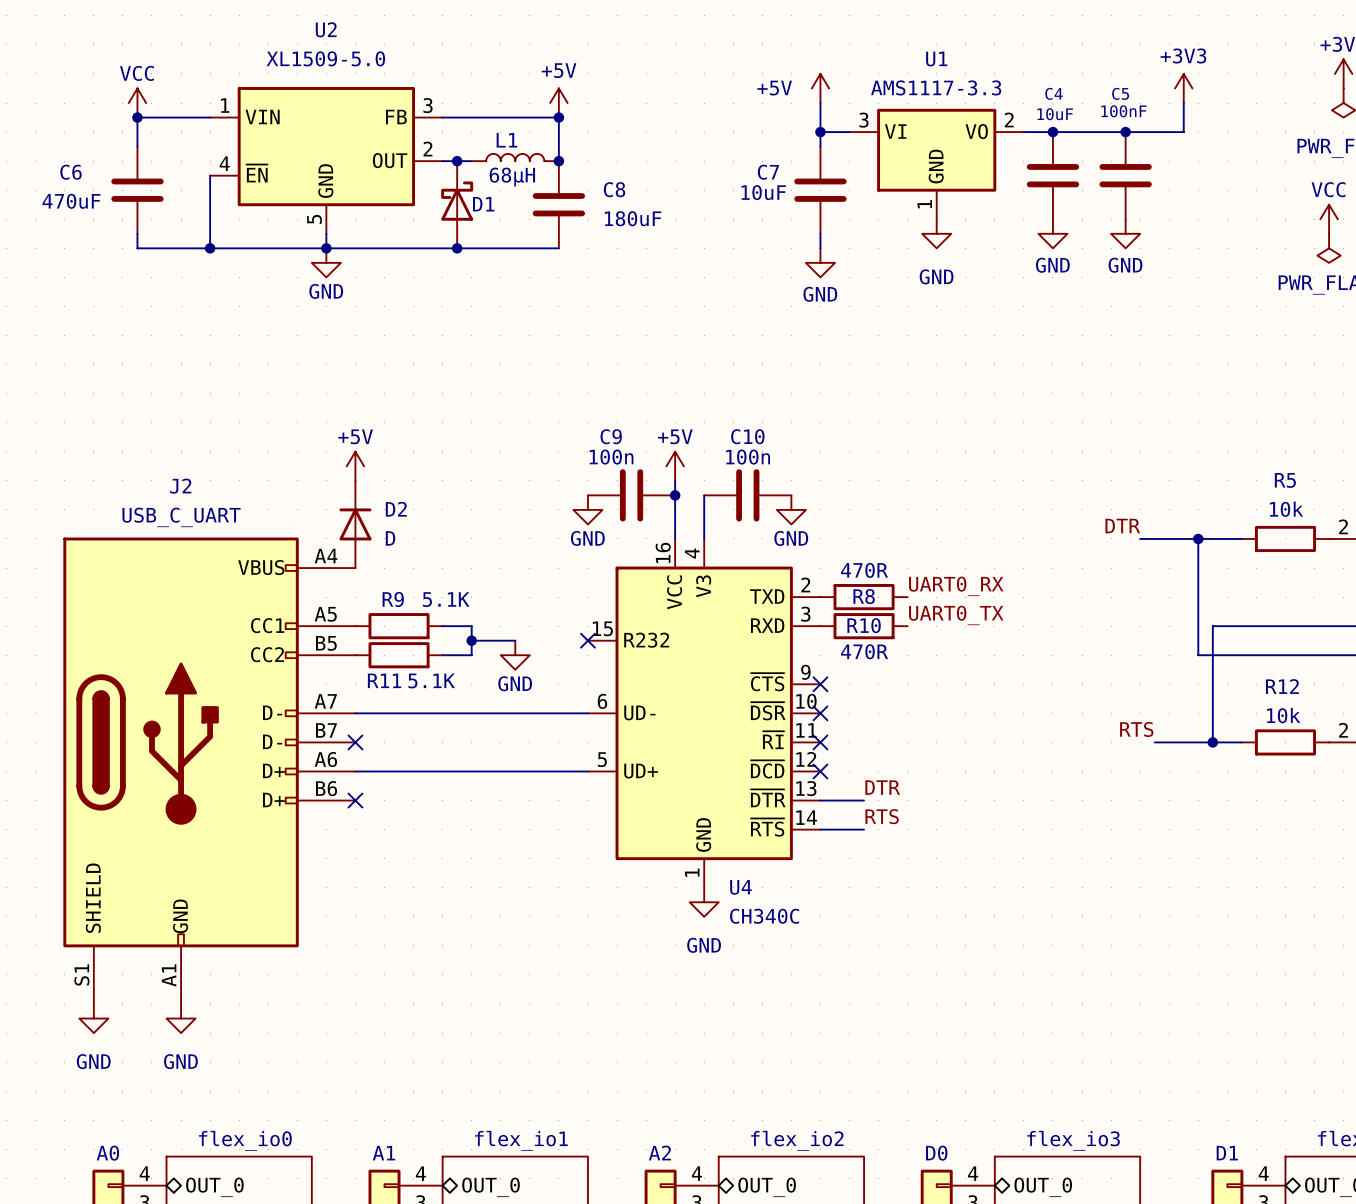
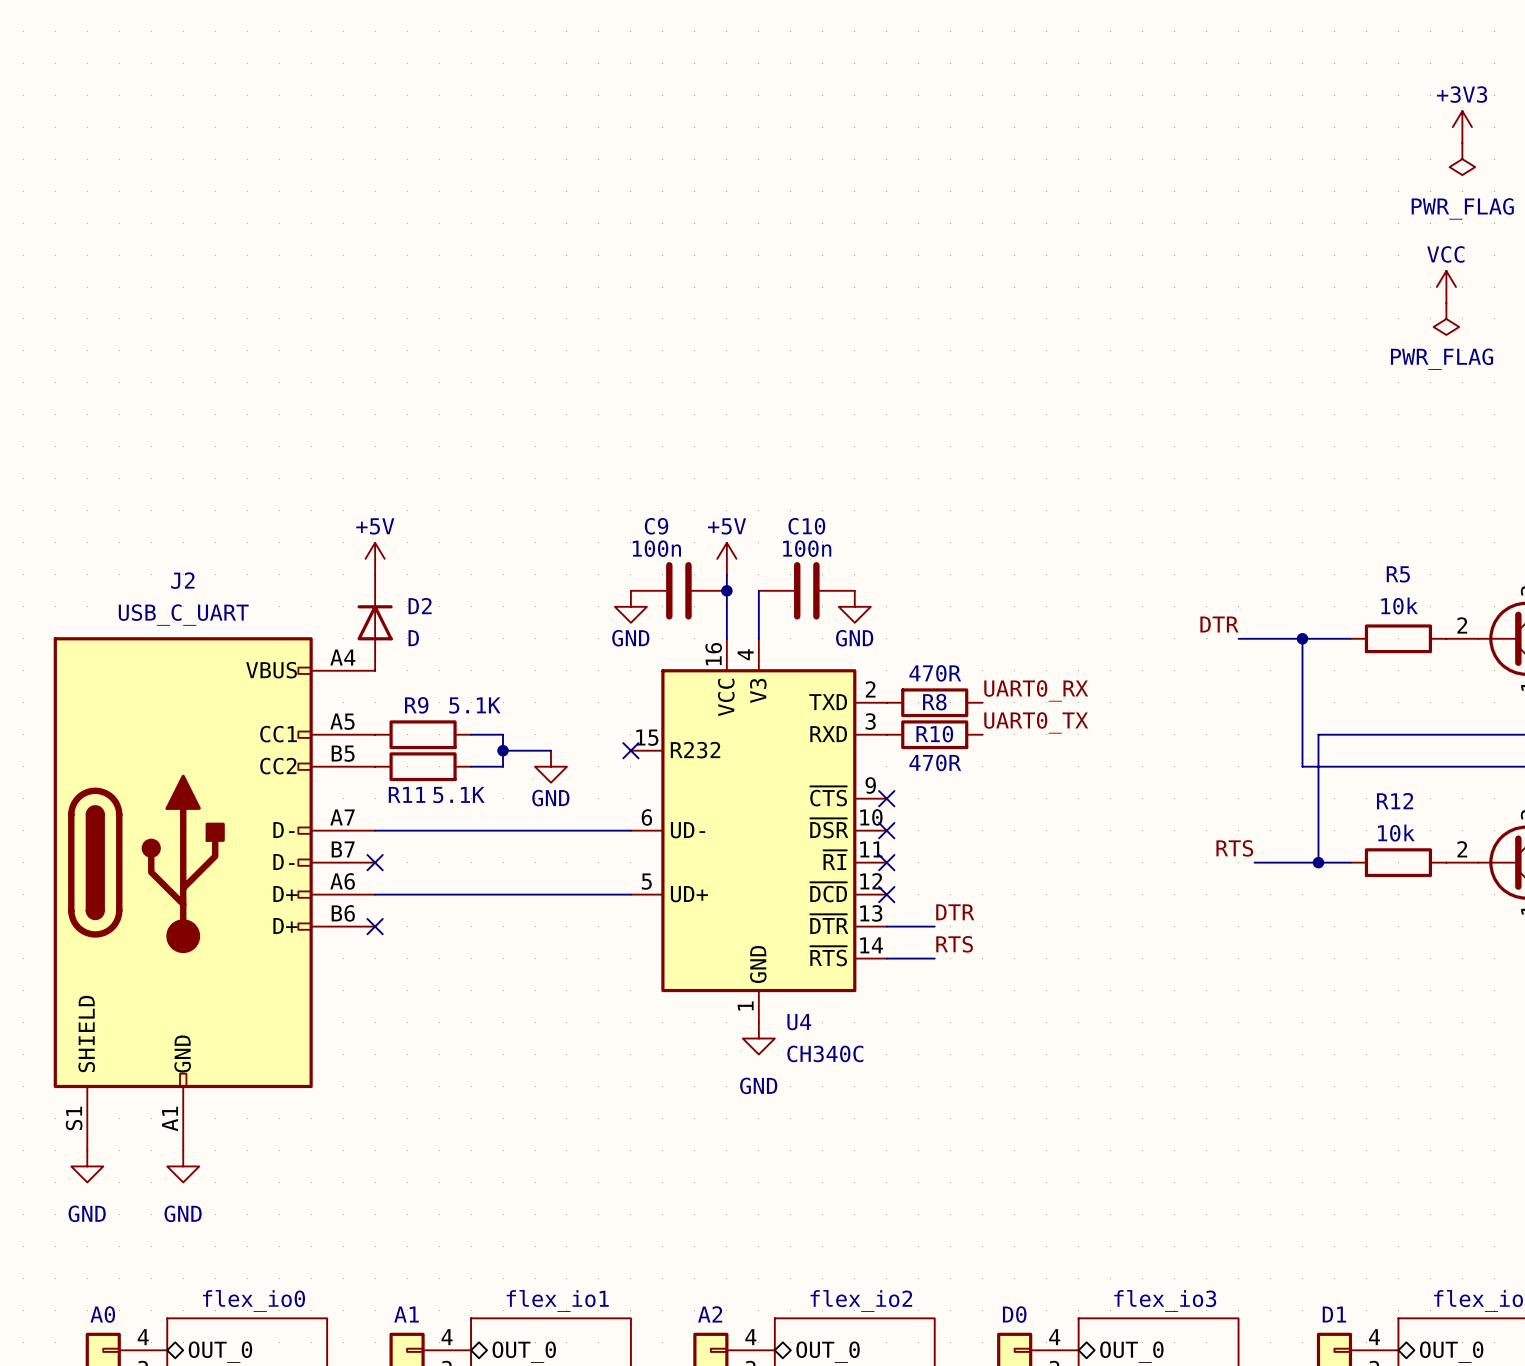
power symbol: +5V (820, 88) -> none
power symbol: +3V3 (1183, 88) -> none
power symbol: VCC (137, 103) -> none
power symbol: +5V (558, 103) -> none
wire: (820, 103) (820, 146) -> none
wire: (1183, 103) (1183, 132) (1023, 132) -> none
junction: (137, 117) -> none
wire: (210, 117) (137, 117) (137, 146) -> none
wire: (442, 117) (558, 117) (558, 161) -> none
junction: (558, 117) -> none
wire: (820, 132) (849, 132) -> none
junction: (820, 132) -> none
junction: (1052, 132) -> none
junction: (1125, 132) -> none
L1: 68µH (515, 157) -> none
U2: XL1509-5.0 (326, 160) -> none
wire: (442, 161) (471, 161) -> none
junction: (457, 161) -> none
junction: (558, 161) -> none
U1: AMS1117-3.3 (936, 164) -> none
wire: (210, 175) (210, 248) -> none
C4: 10uF (1052, 175) -> none
C5: 100nF (1125, 175) -> none
C6: 470uF (137, 190) -> none
C7: 10uF (820, 190) -> none
D1: (457, 204) -> none
C8: 180uF (558, 204) -> none
wire: (137, 233) (137, 248) (558, 248) -> none
wire: (326, 233) (326, 248) -> none
wire: (820, 233) (820, 248) -> none
power symbol: GND (936, 233) -> none
power symbol: GND (1052, 233) -> none
power symbol: GND (1125, 233) -> none
junction: (210, 248) -> none
junction: (326, 248) -> none
junction: (457, 248) -> none
power symbol: GND (326, 262) -> none
power symbol: GND (820, 262) -> none

